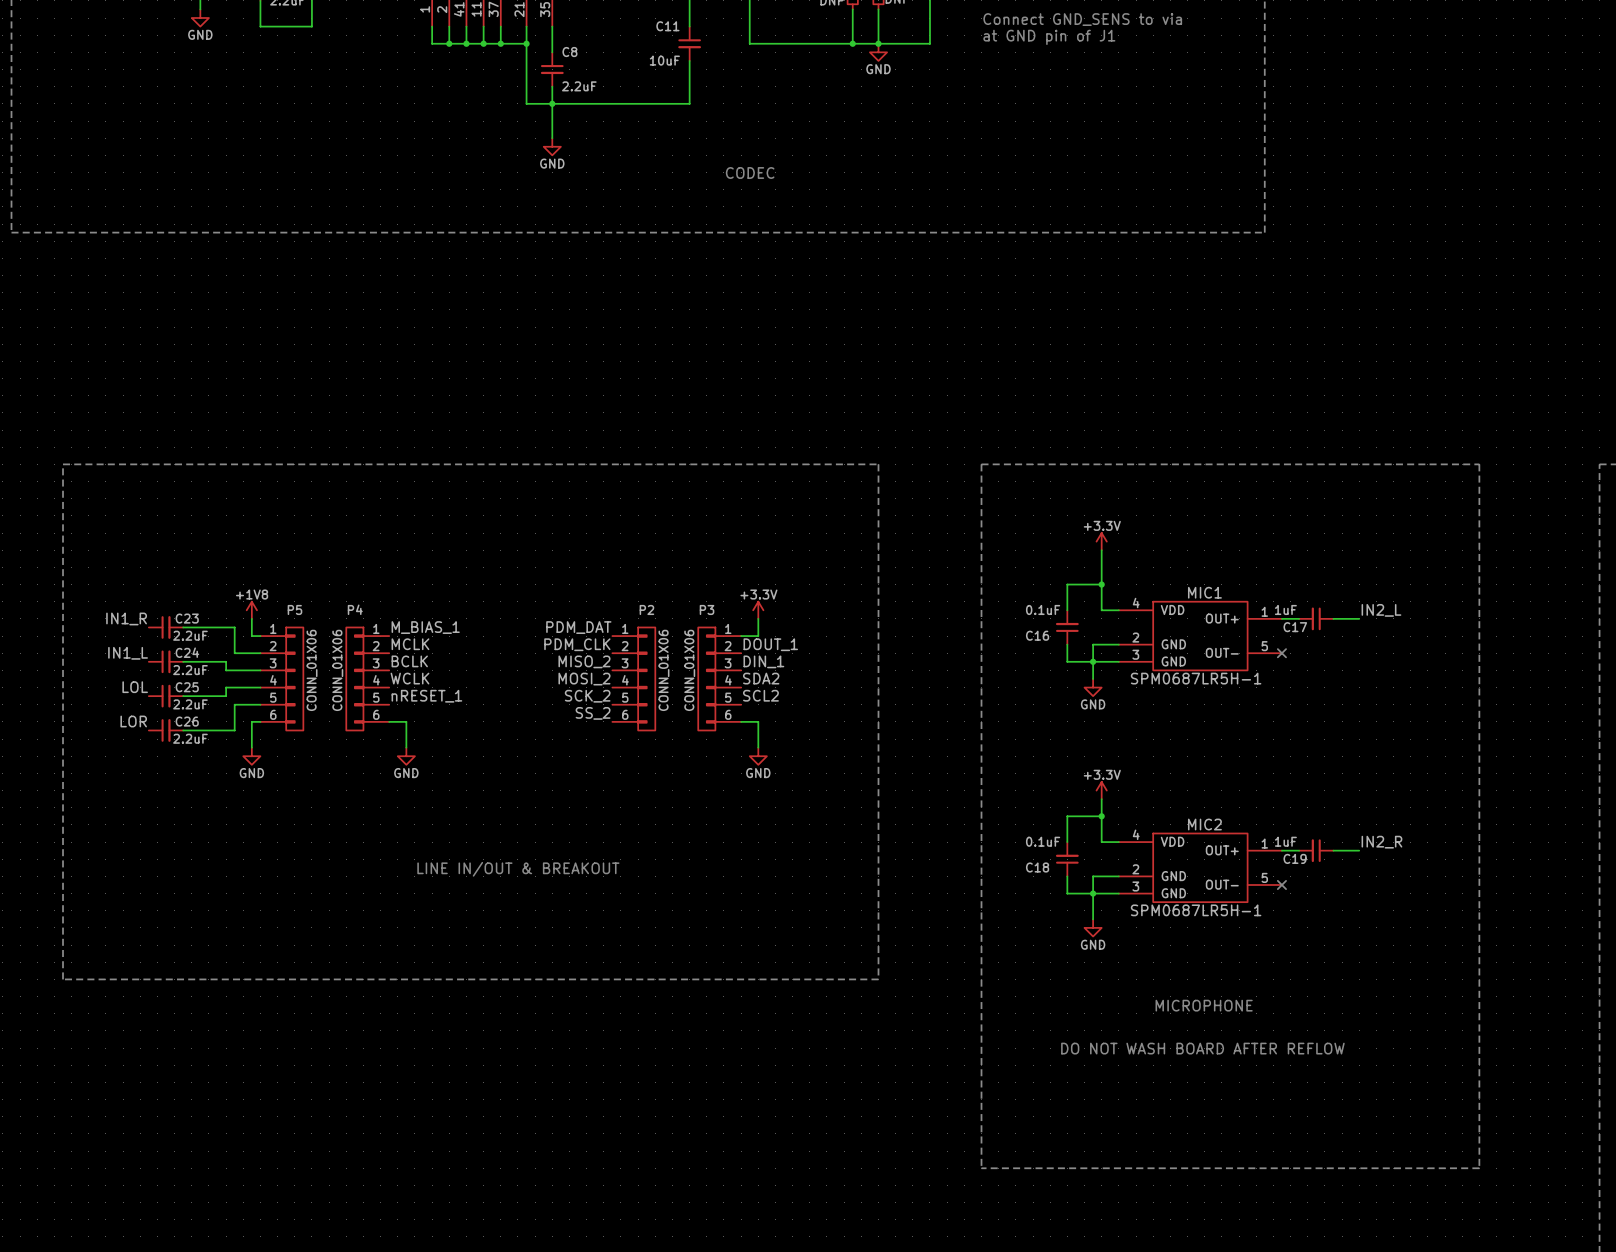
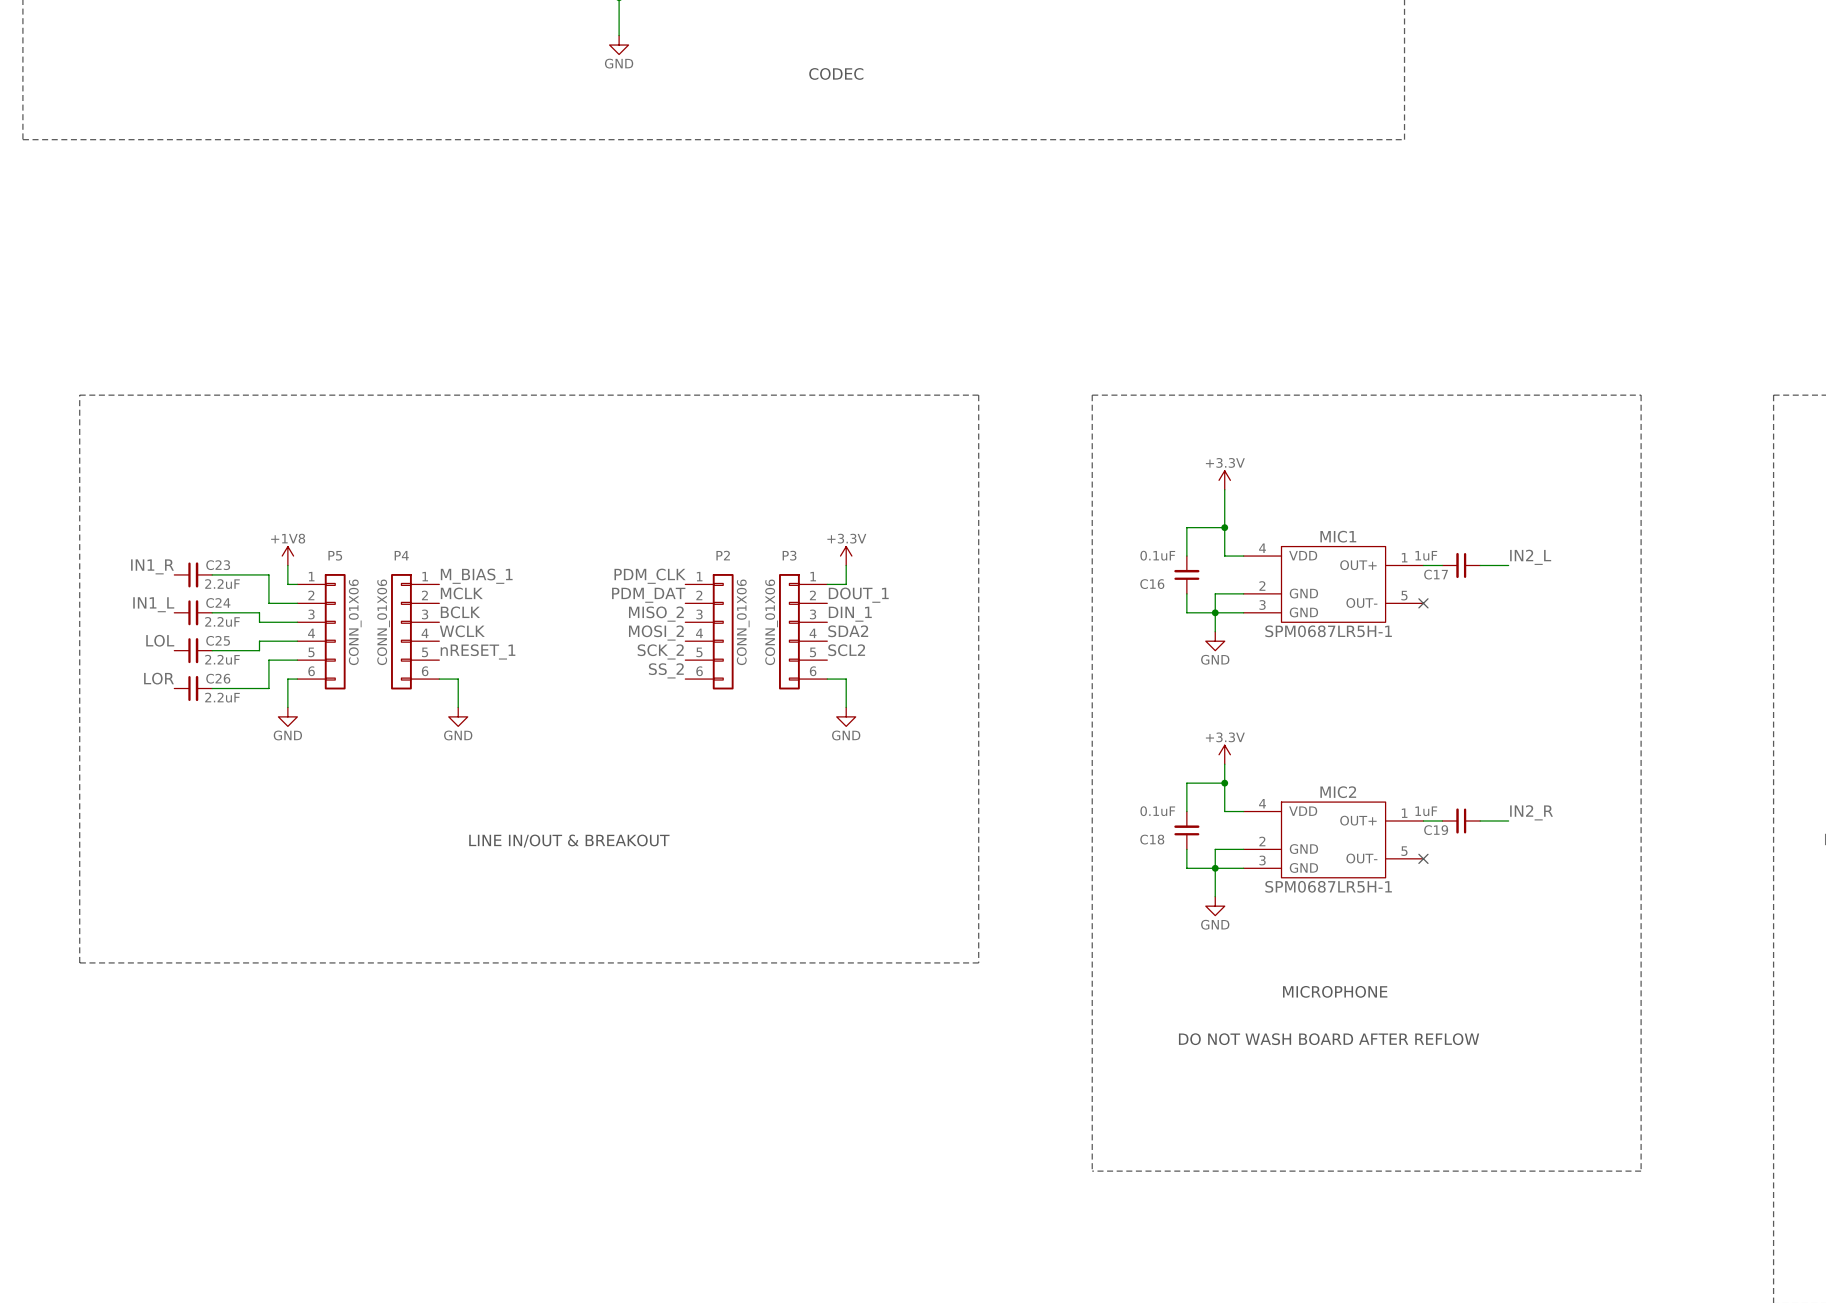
label: PDM_DAT (578, 627) -> PDM_CLK (650, 576)
label: PDM_CLK (577, 644) -> PDM_DAT (648, 595)

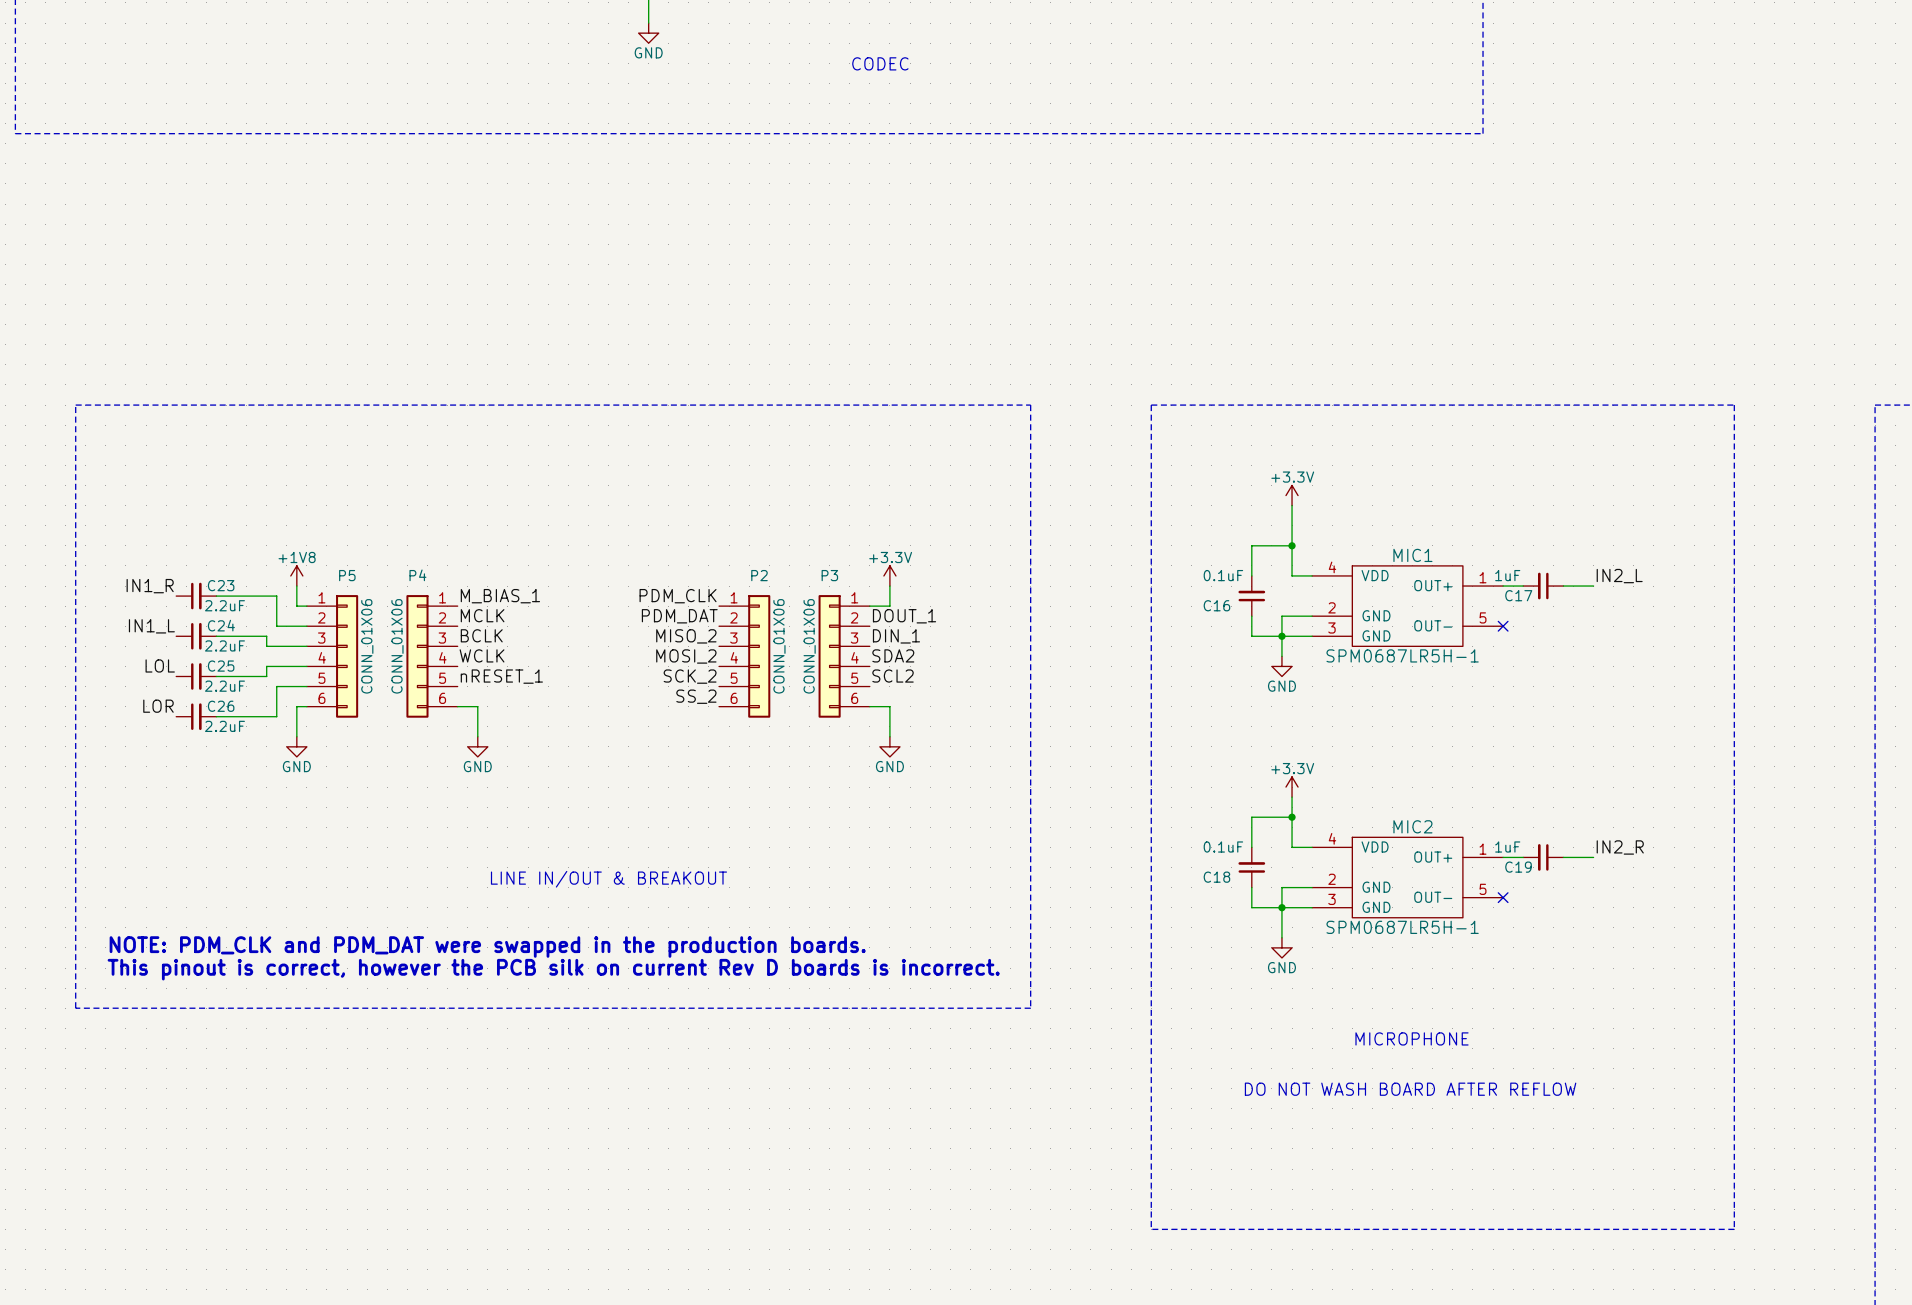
text: none -> NOTE: PDM_CLK and PDM_DAT were swapped in the production boards. (487, 947)
text: none -> This pinout is correct, however the PCB silk on current Rev D boards is incorrect. (553, 969)

